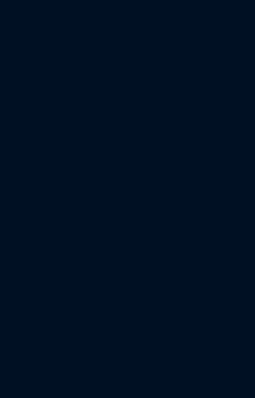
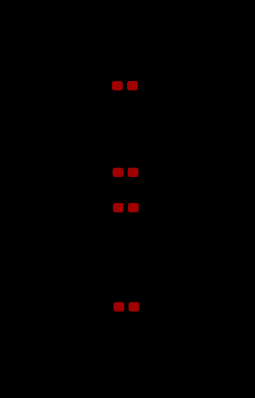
part: none -> (124, 85)
part: none -> (125, 172)
part: none -> (125, 207)
part: none -> (126, 306)

